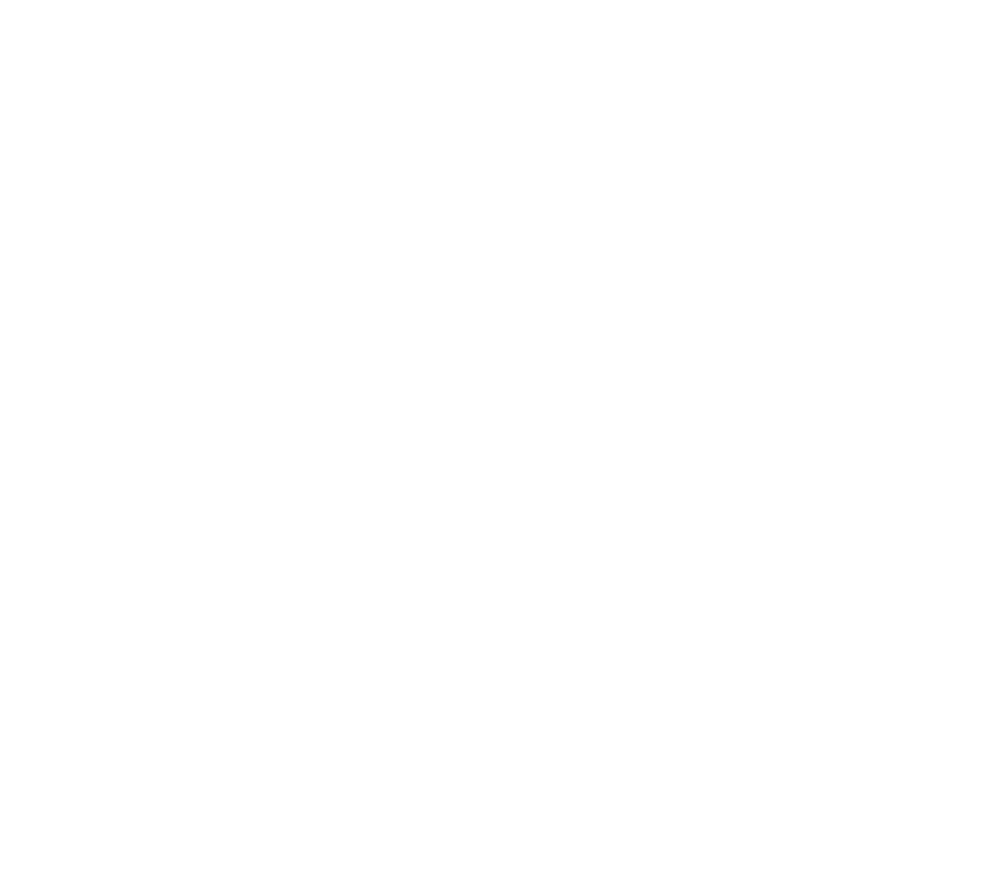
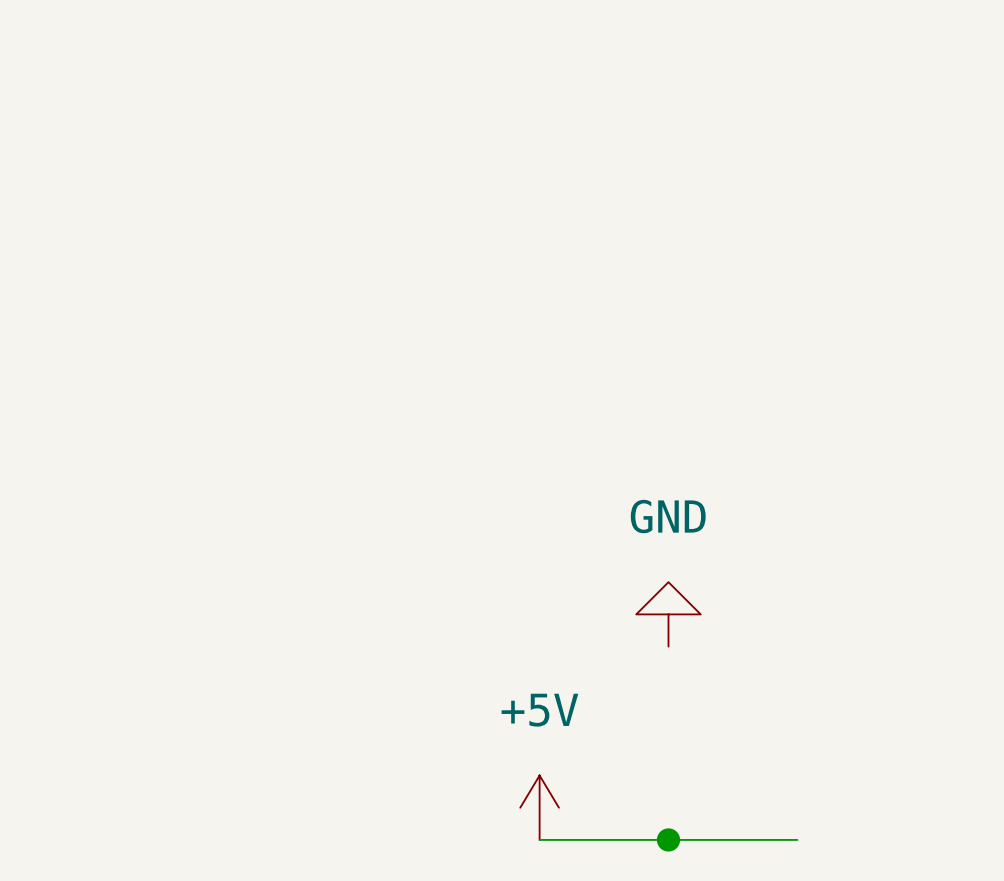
power symbol: none -> GND (668, 614)
power symbol: none -> +5V (539, 807)
wire: none -> (539, 839) (797, 839)
junction: none -> (668, 839)

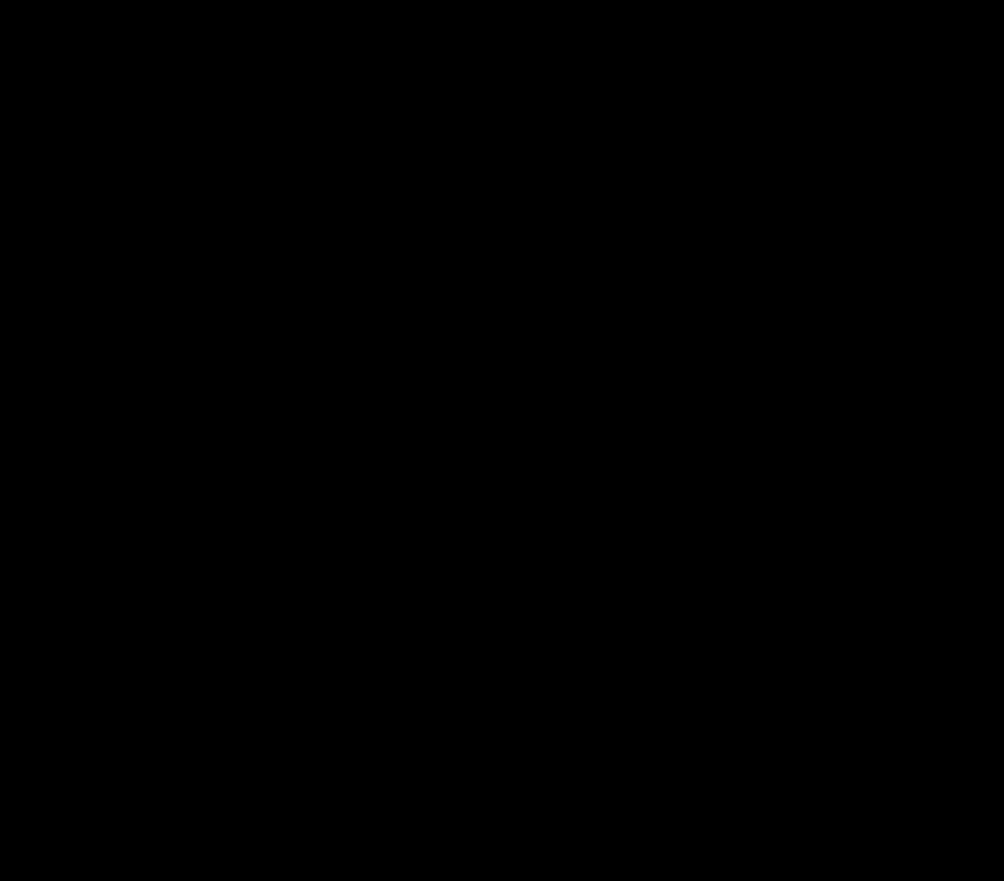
power symbol: GND (668, 614) -> none
power symbol: +5V (539, 807) -> none
wire: (539, 839) (797, 839) -> none
junction: (668, 839) -> none

